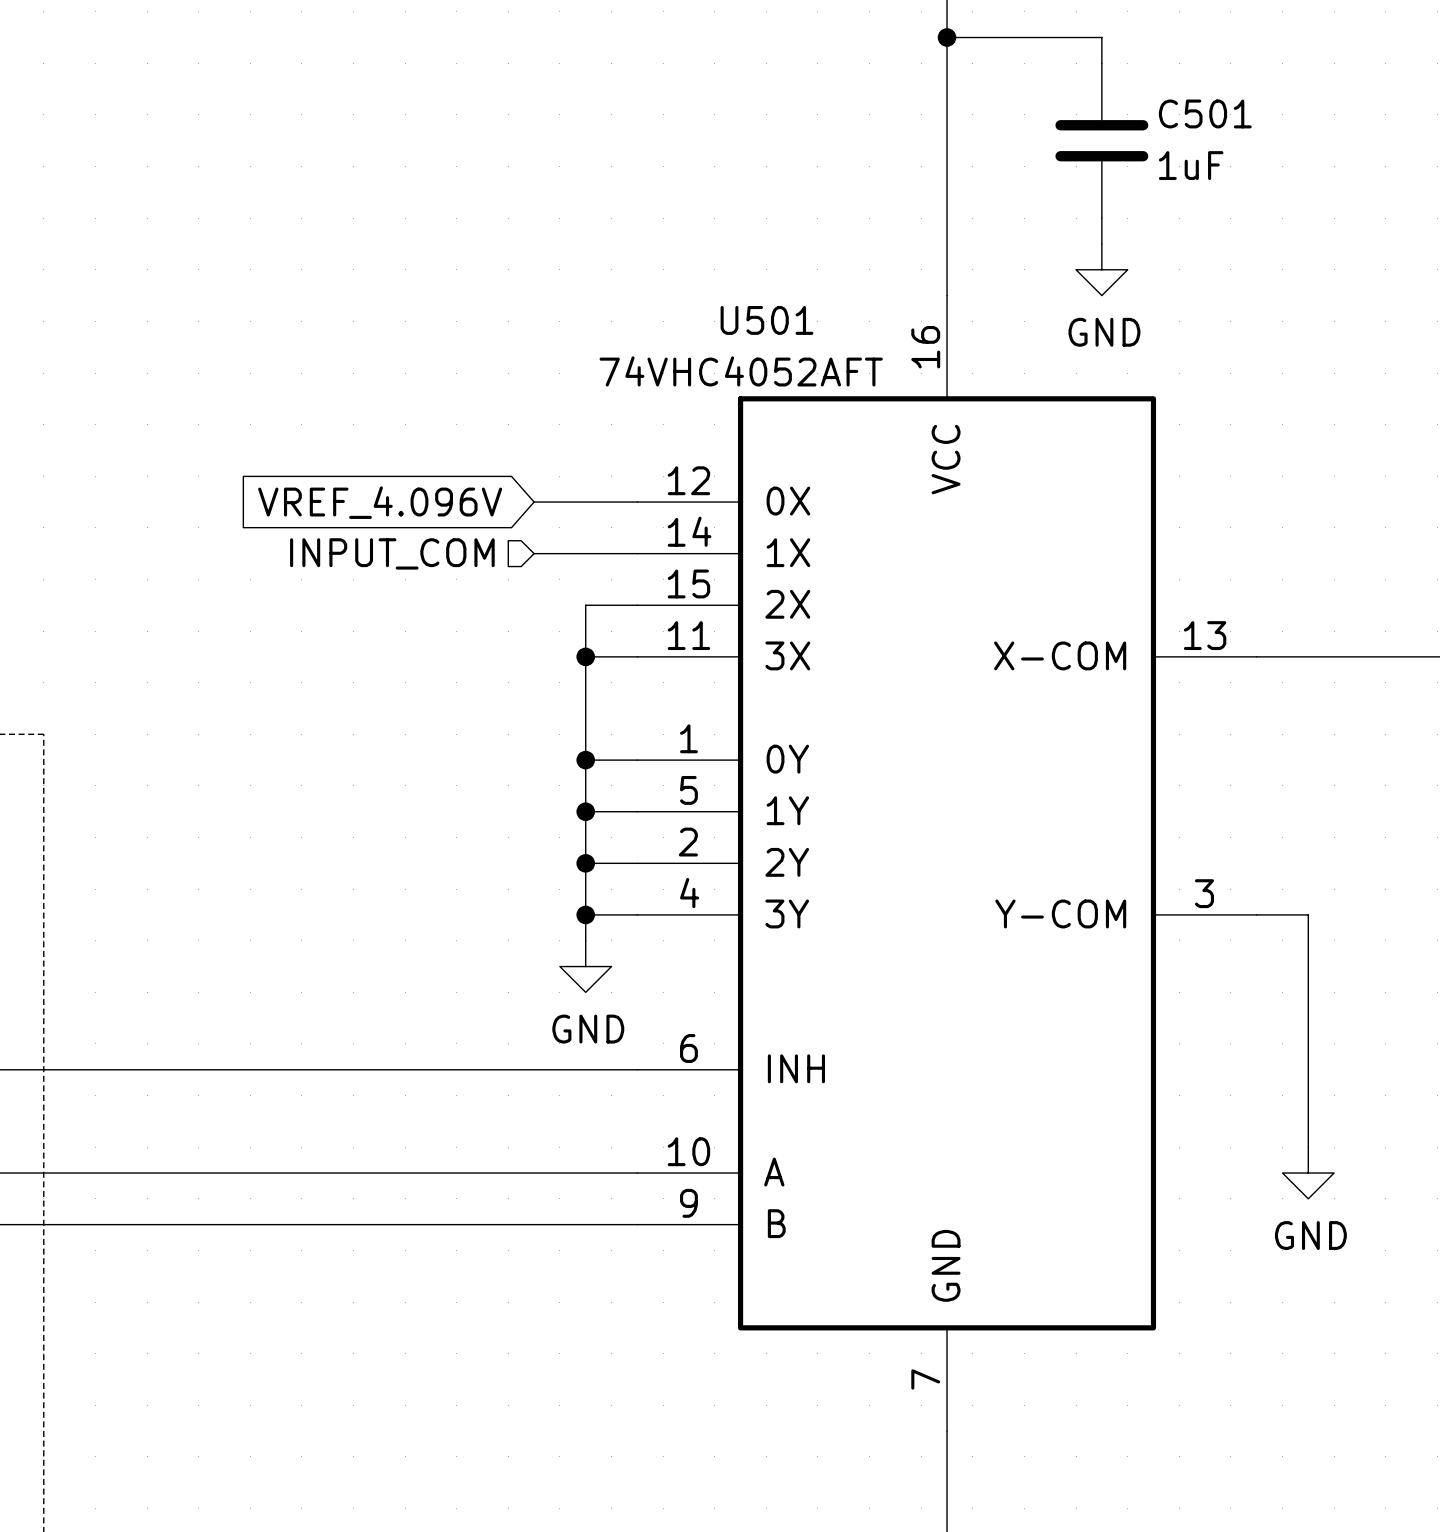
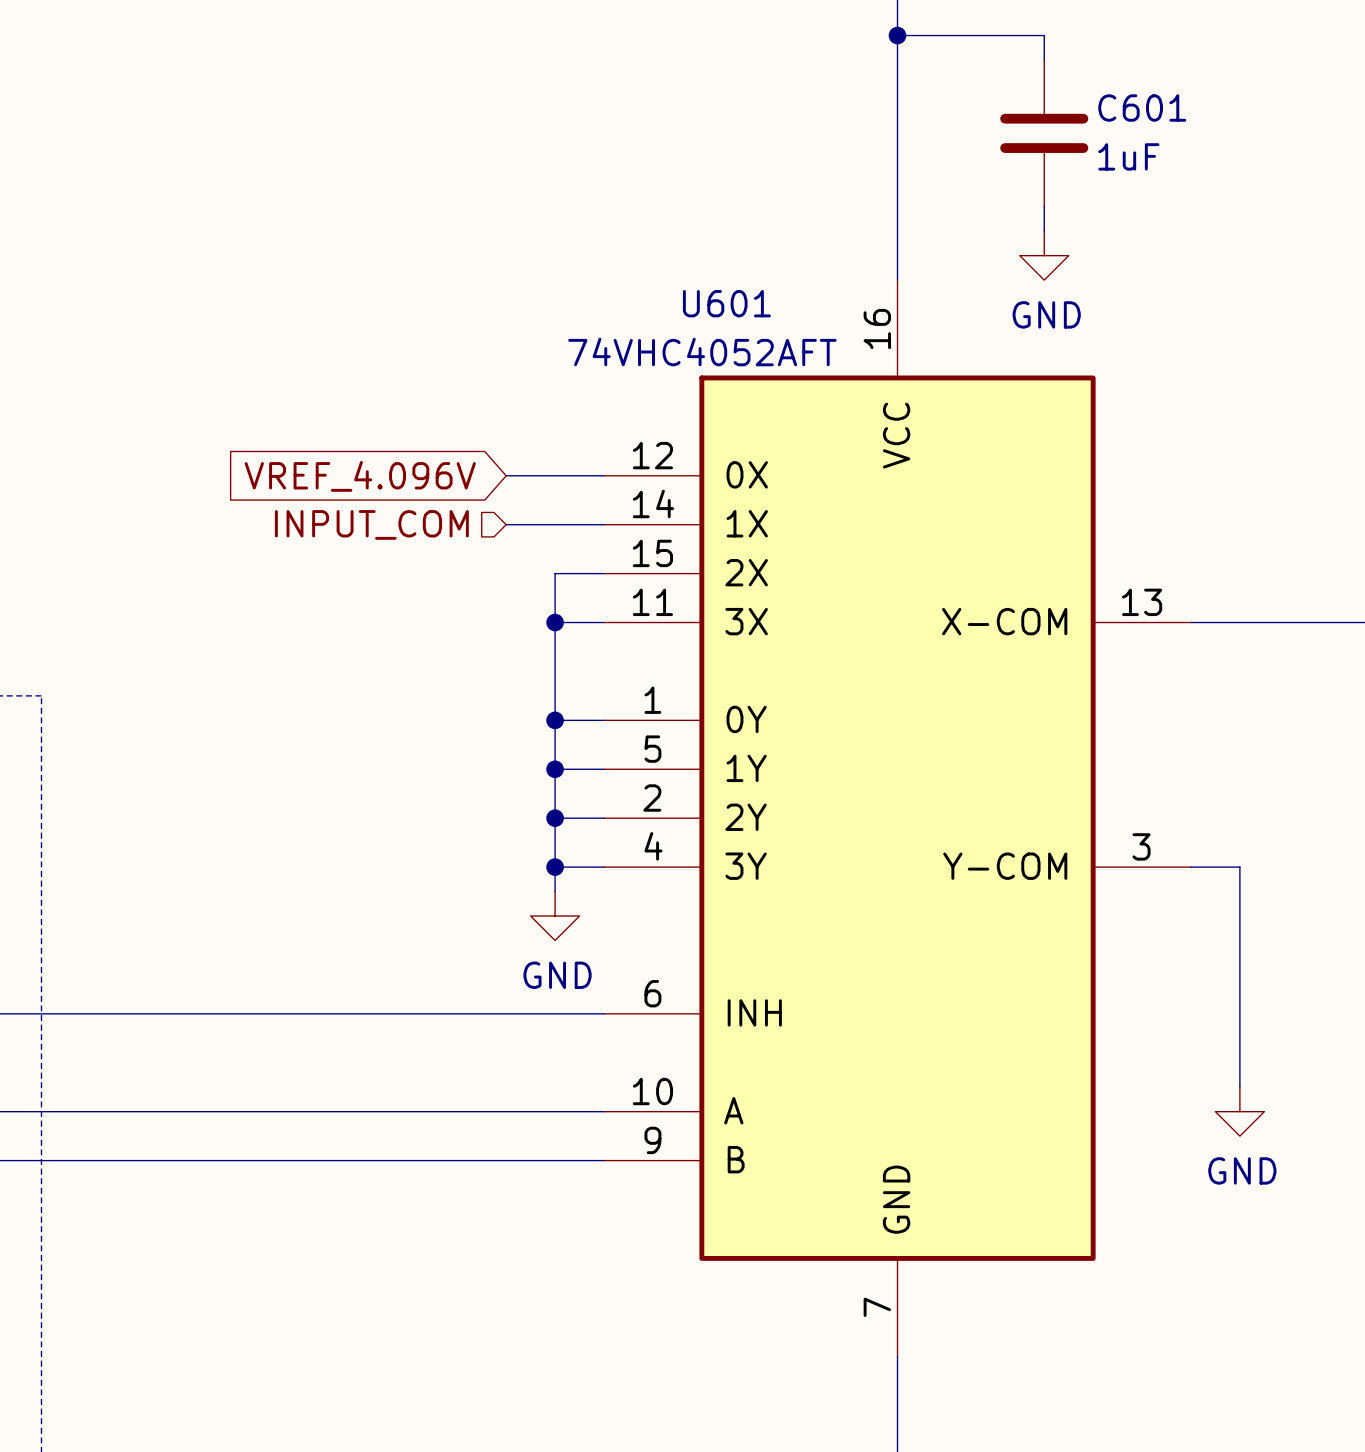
C501 name: C501 (1205, 113) -> C601 (1142, 108)
U501 name: U501 (766, 320) -> U601 (726, 303)

